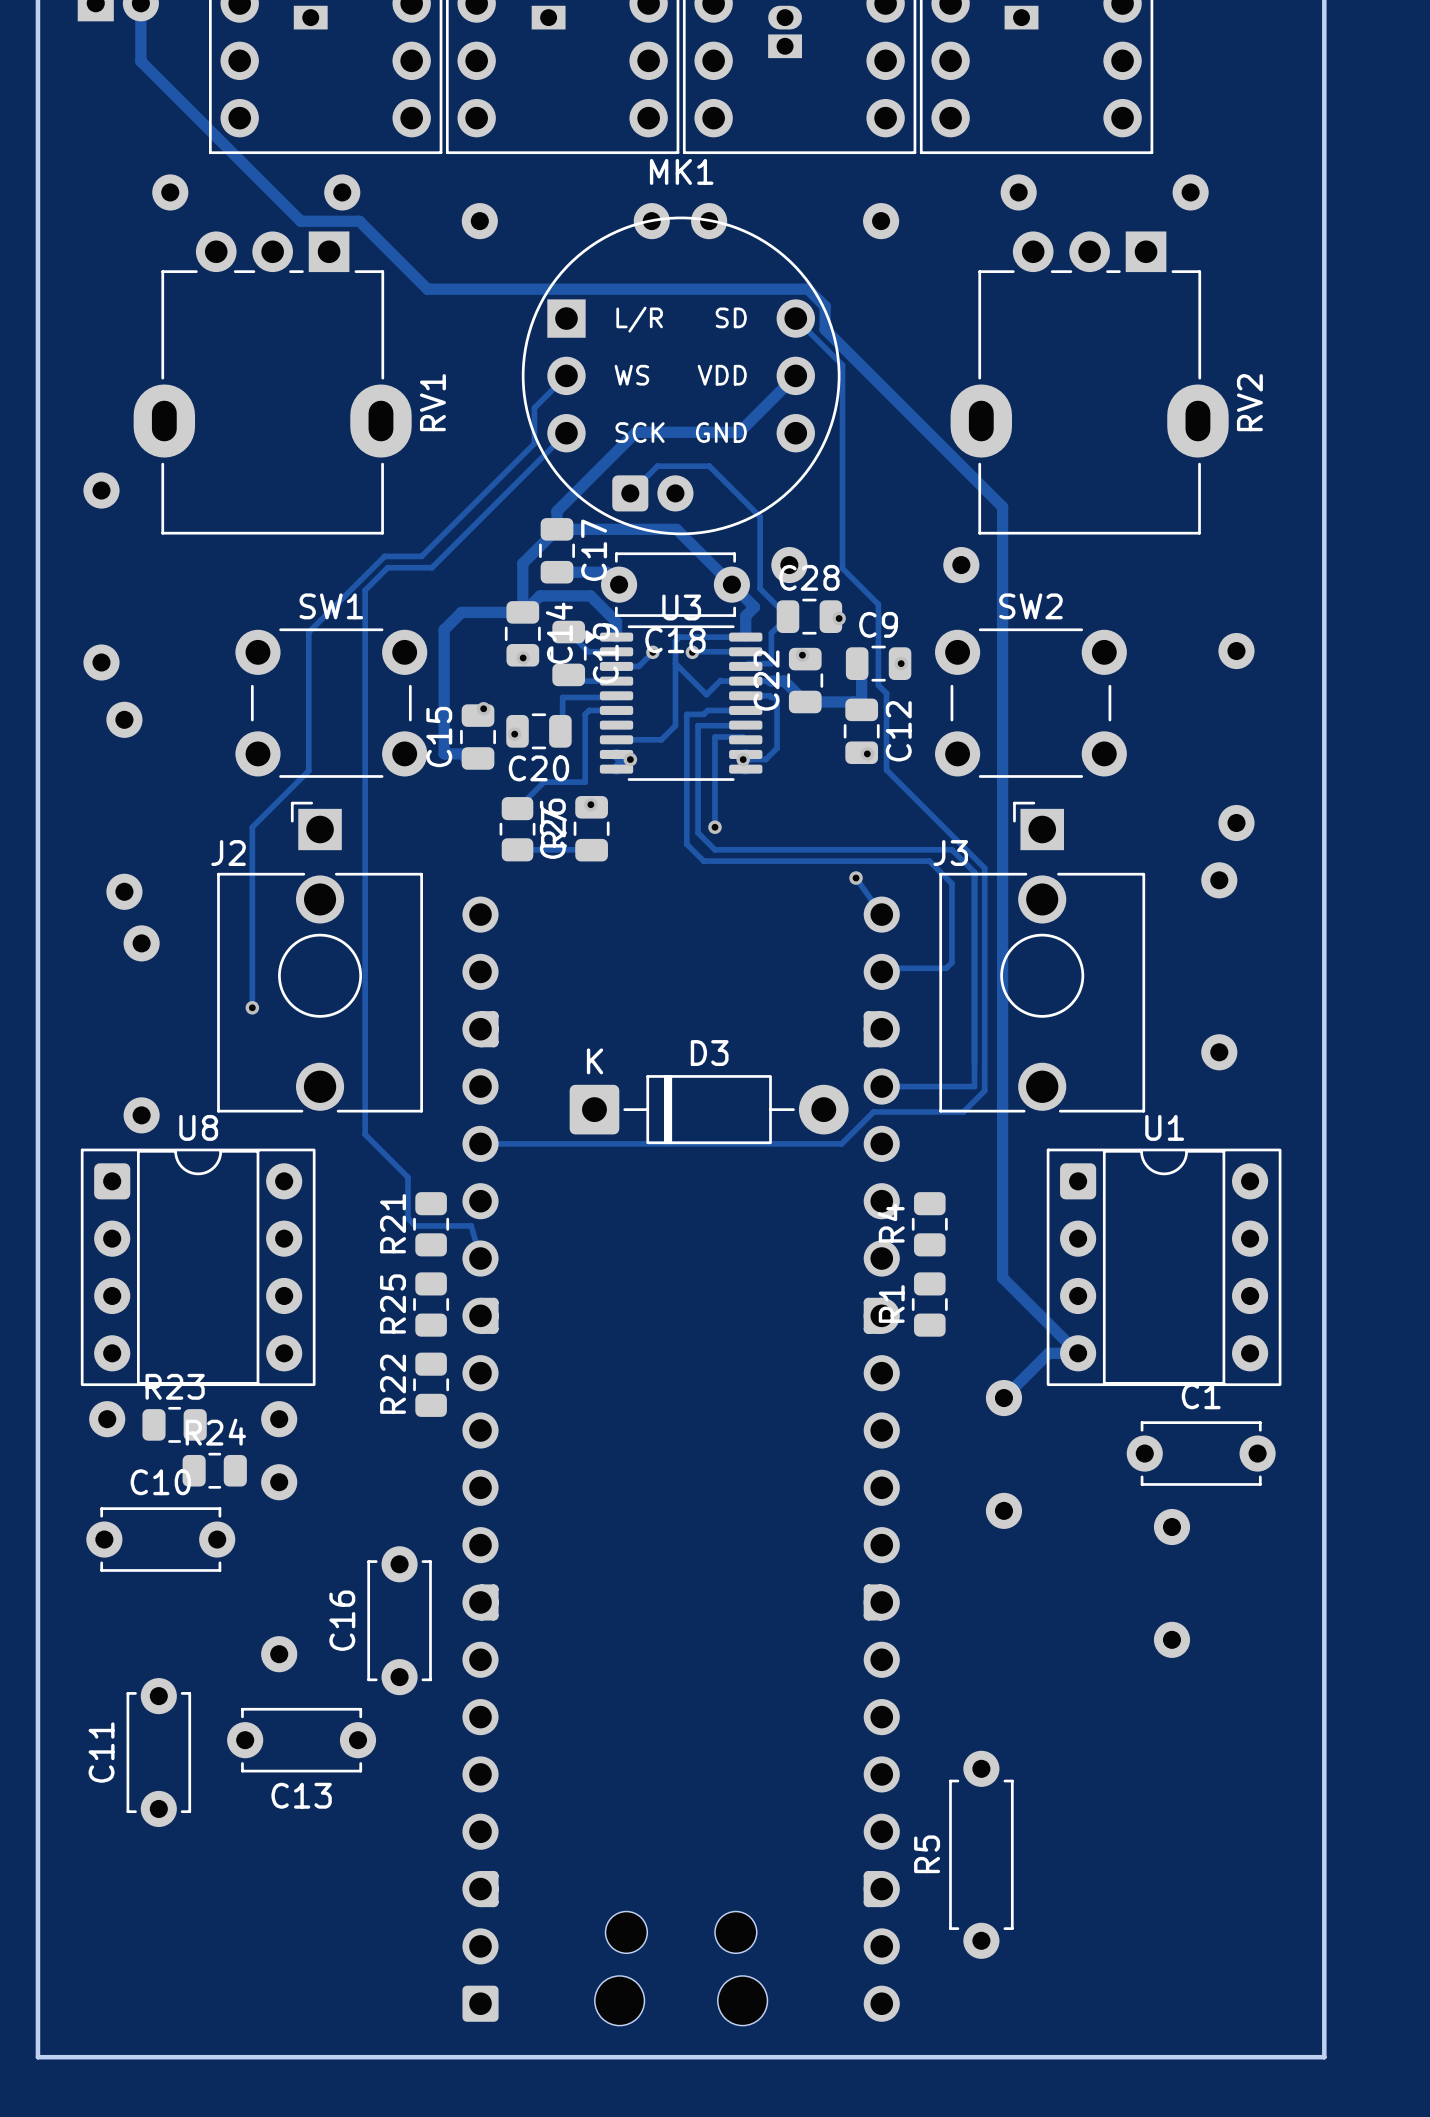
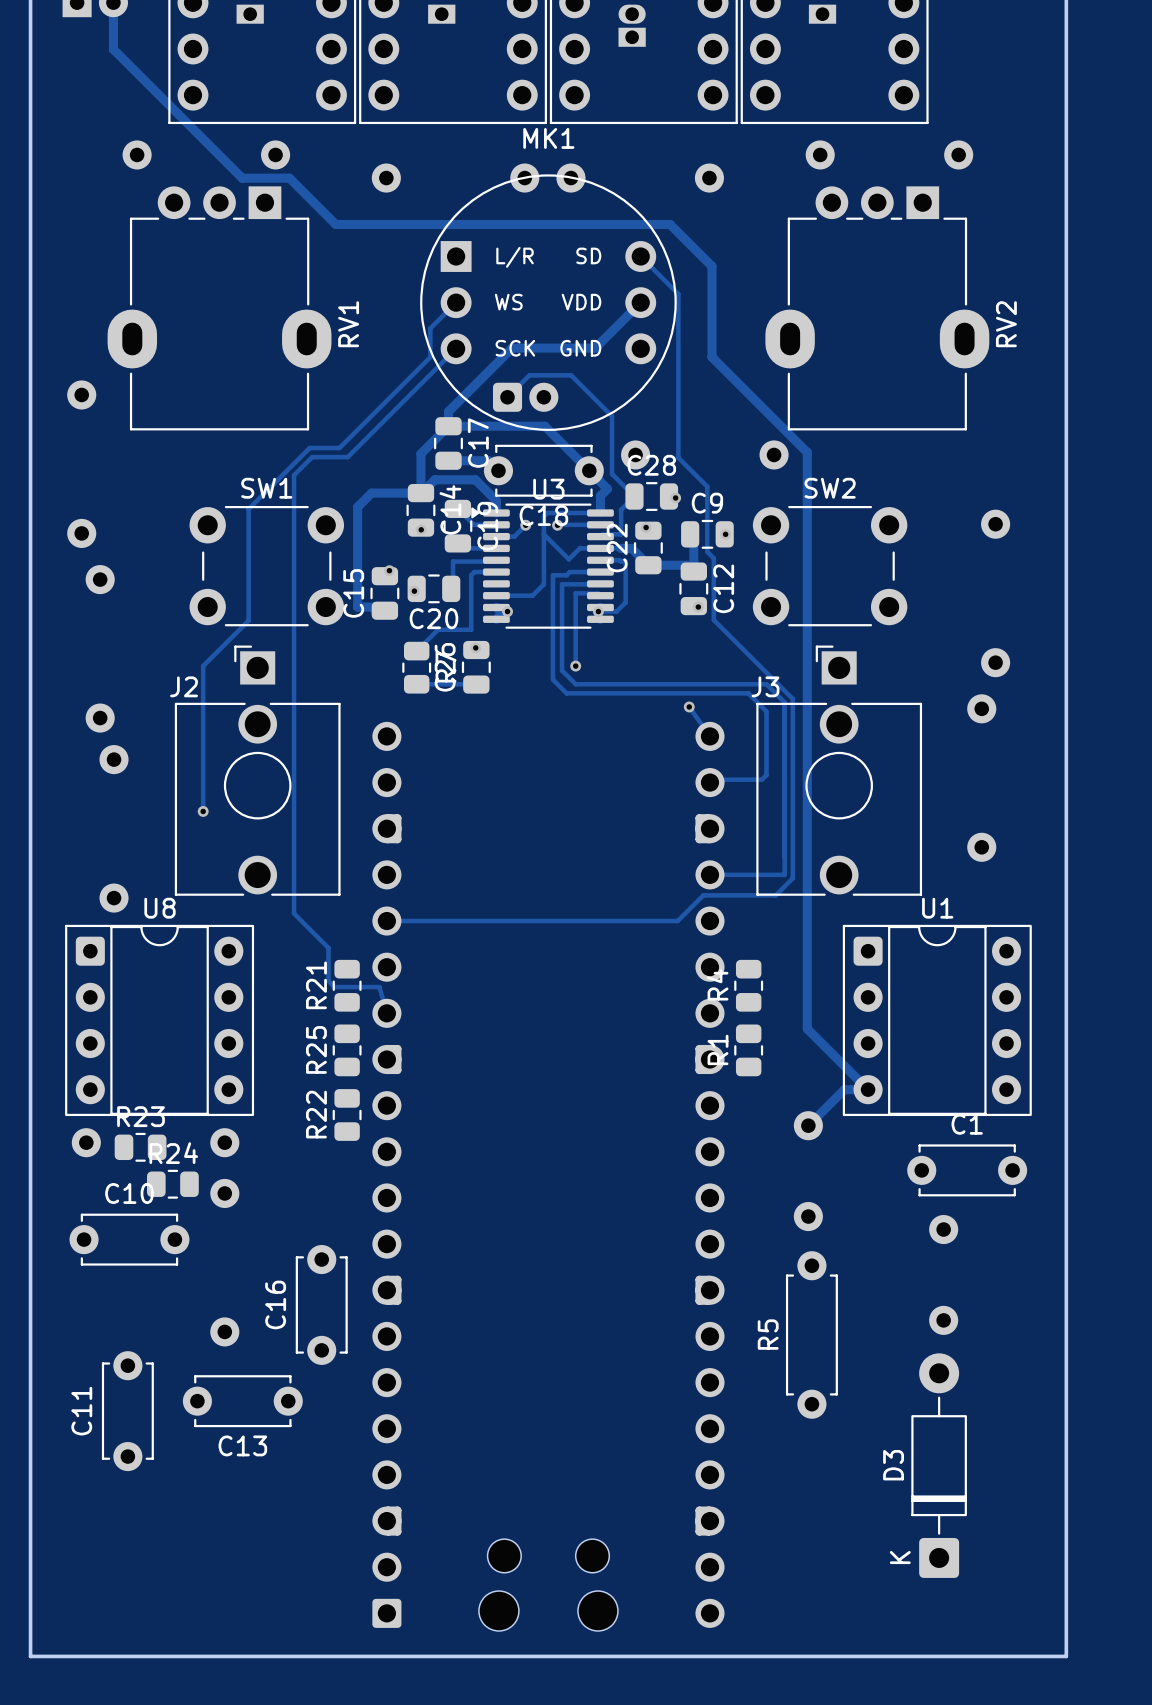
track: (417, 278) (427, 289) (807, 289) (825, 306) (825, 329) (1002, 507) (1002, 561) -> (335, 224) (670, 224) (711, 266) (711, 357) (807, 452)
D3 rotation: 0° (709, 1109) -> 90° counterclockwise (939, 1465)
D3 position: (709, 1109) -> (939, 1465)
R5 position: (981, 1854) -> (811, 1334)

